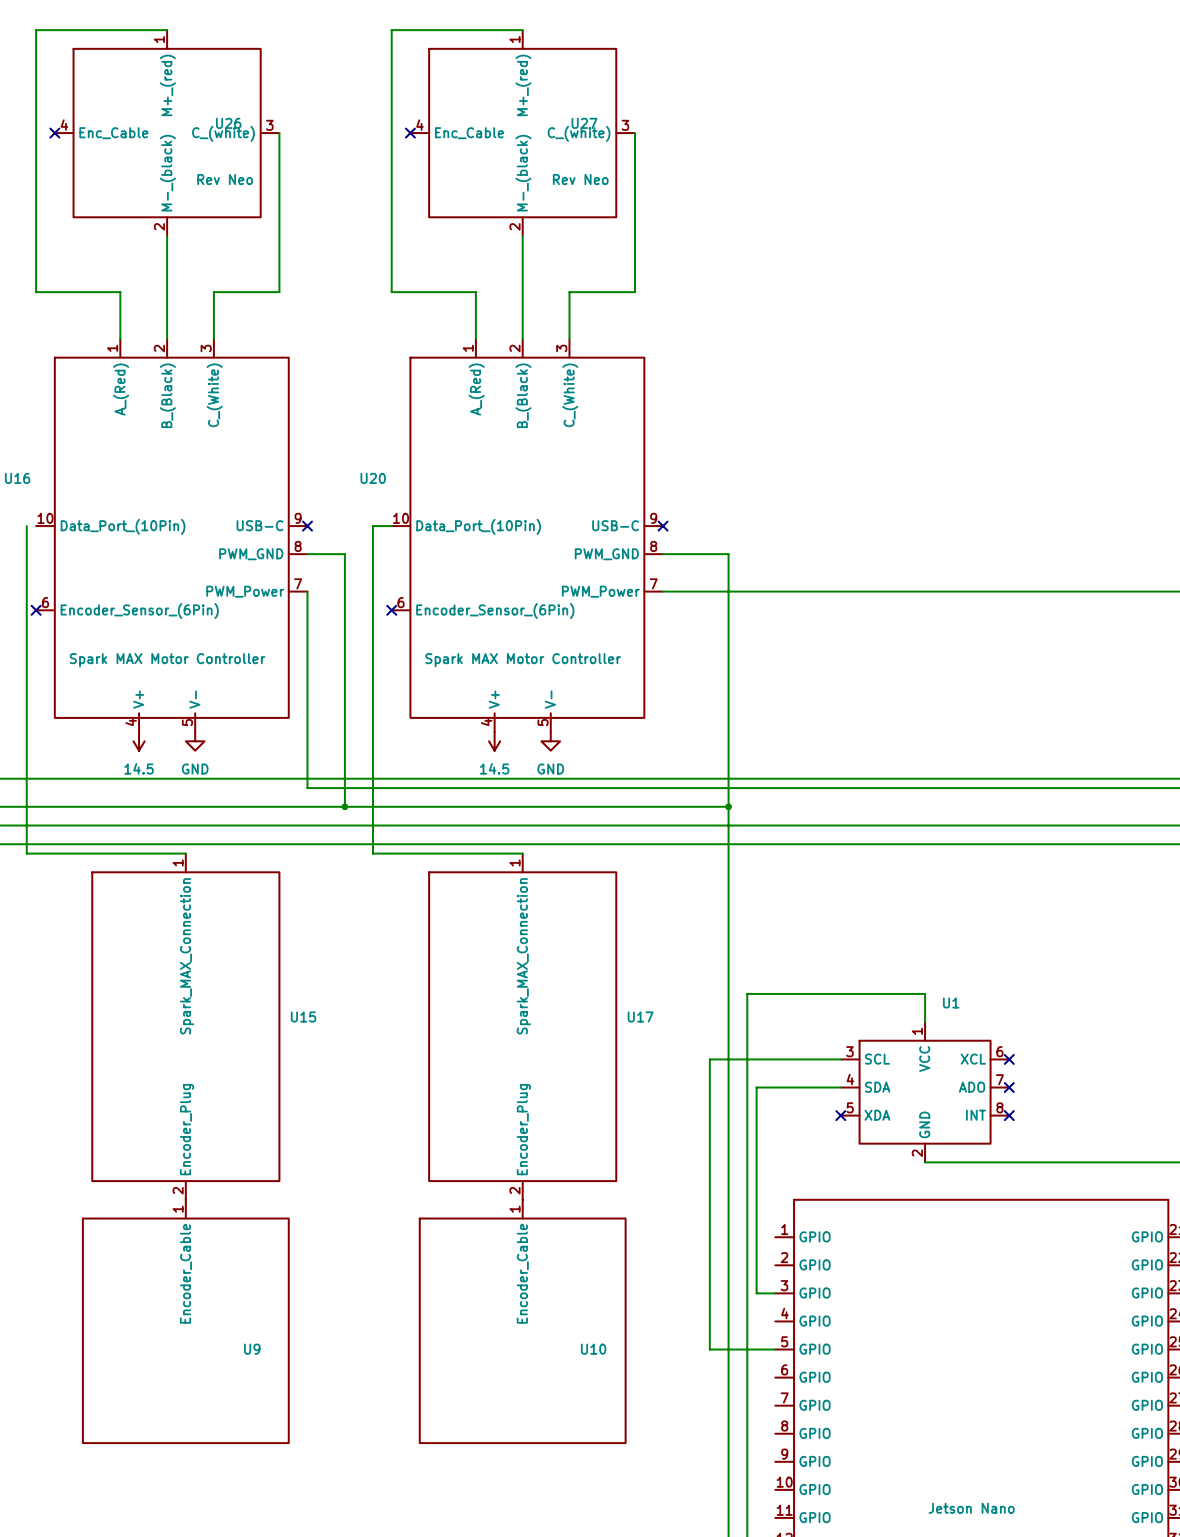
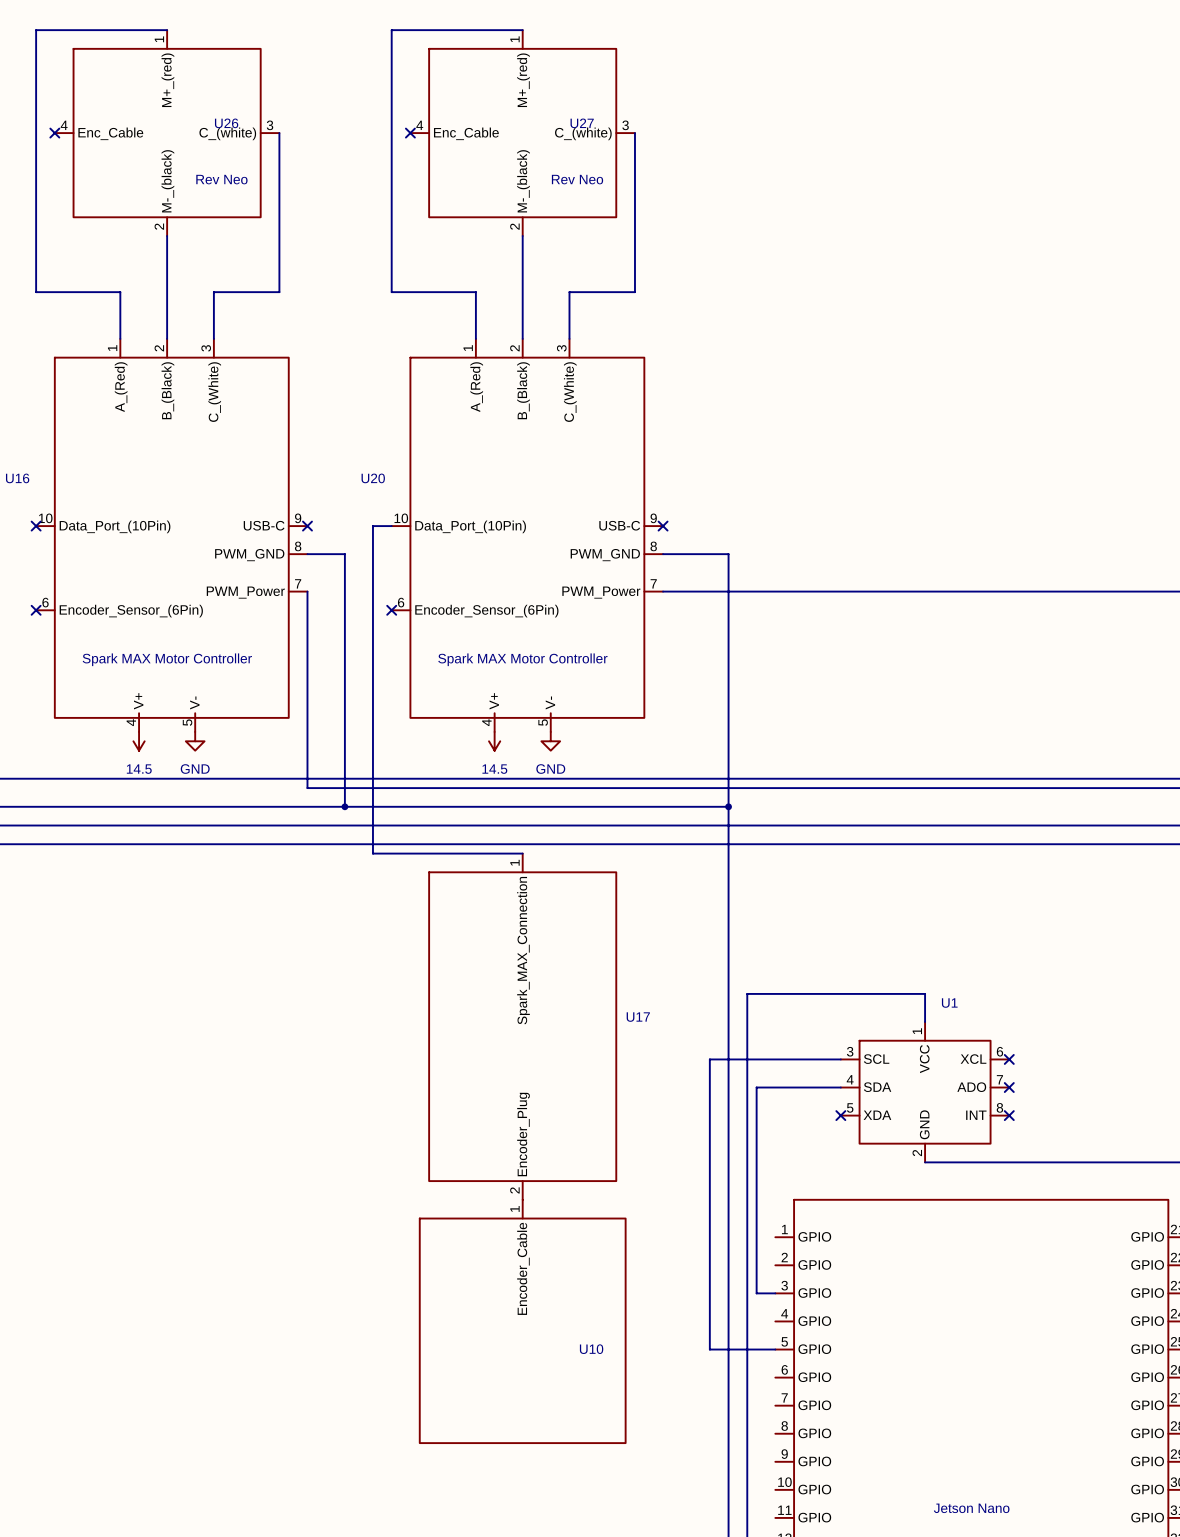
wire: (26, 526) (26, 853) (185, 853) -> none
no-connect mark: none -> (36, 526)
U15: (185, 1026) -> none
U9: (185, 1321) -> none

